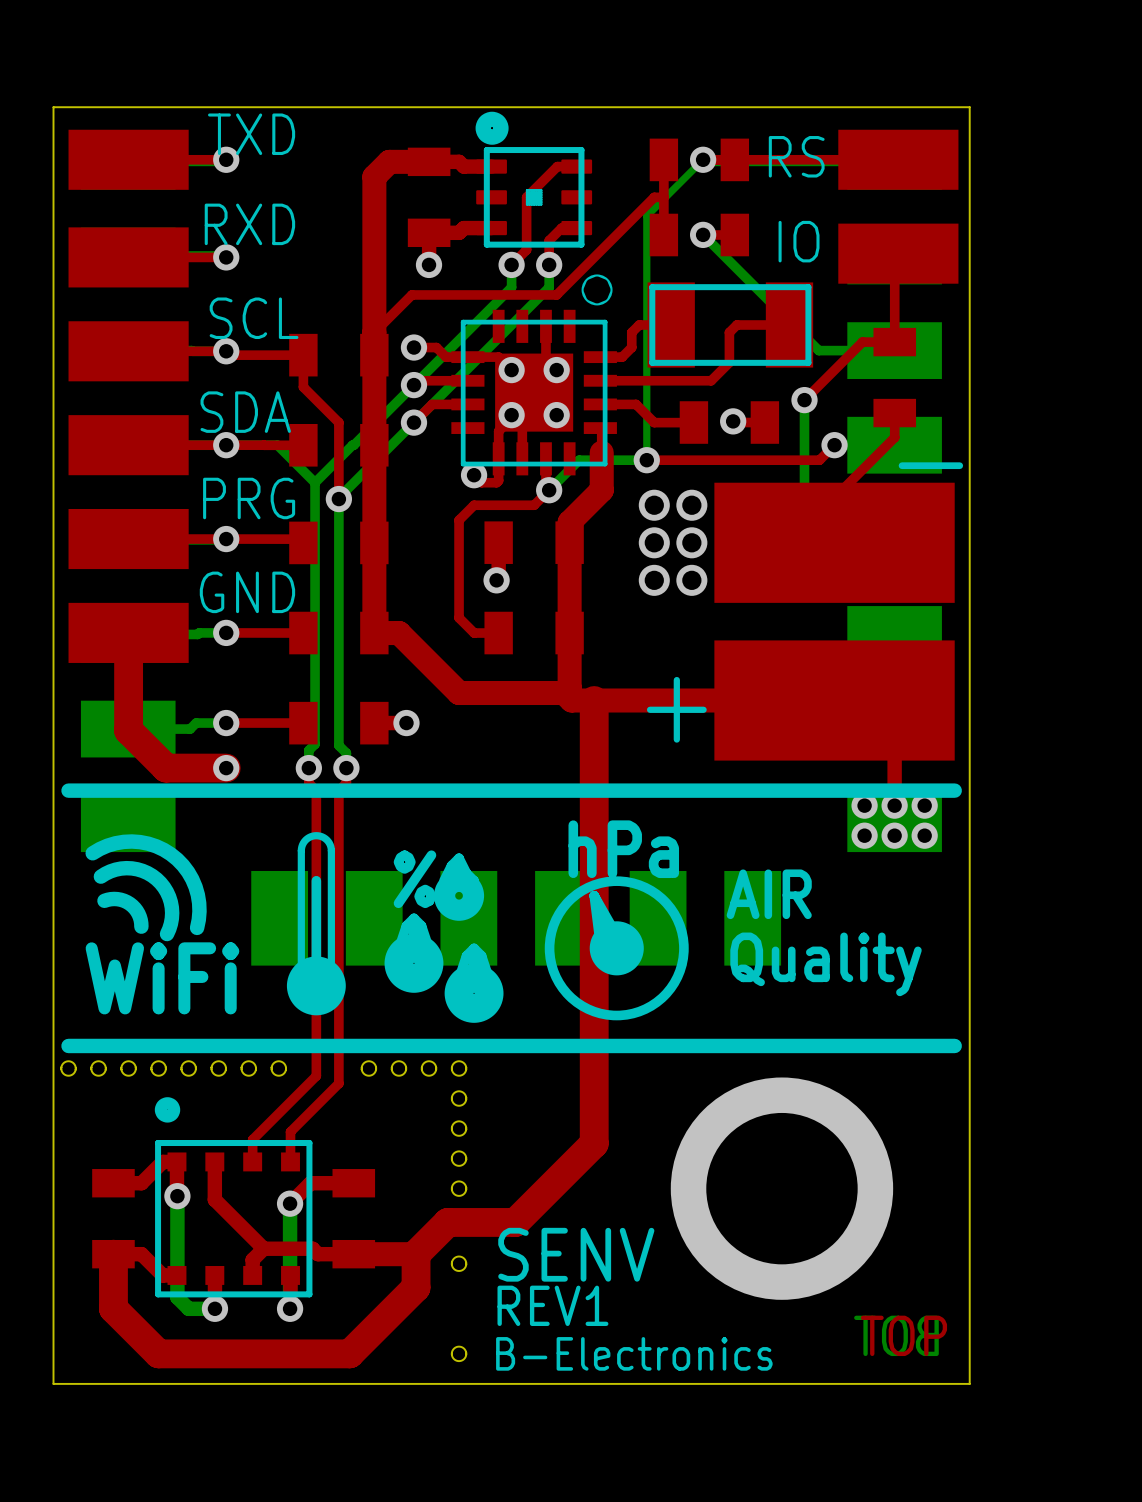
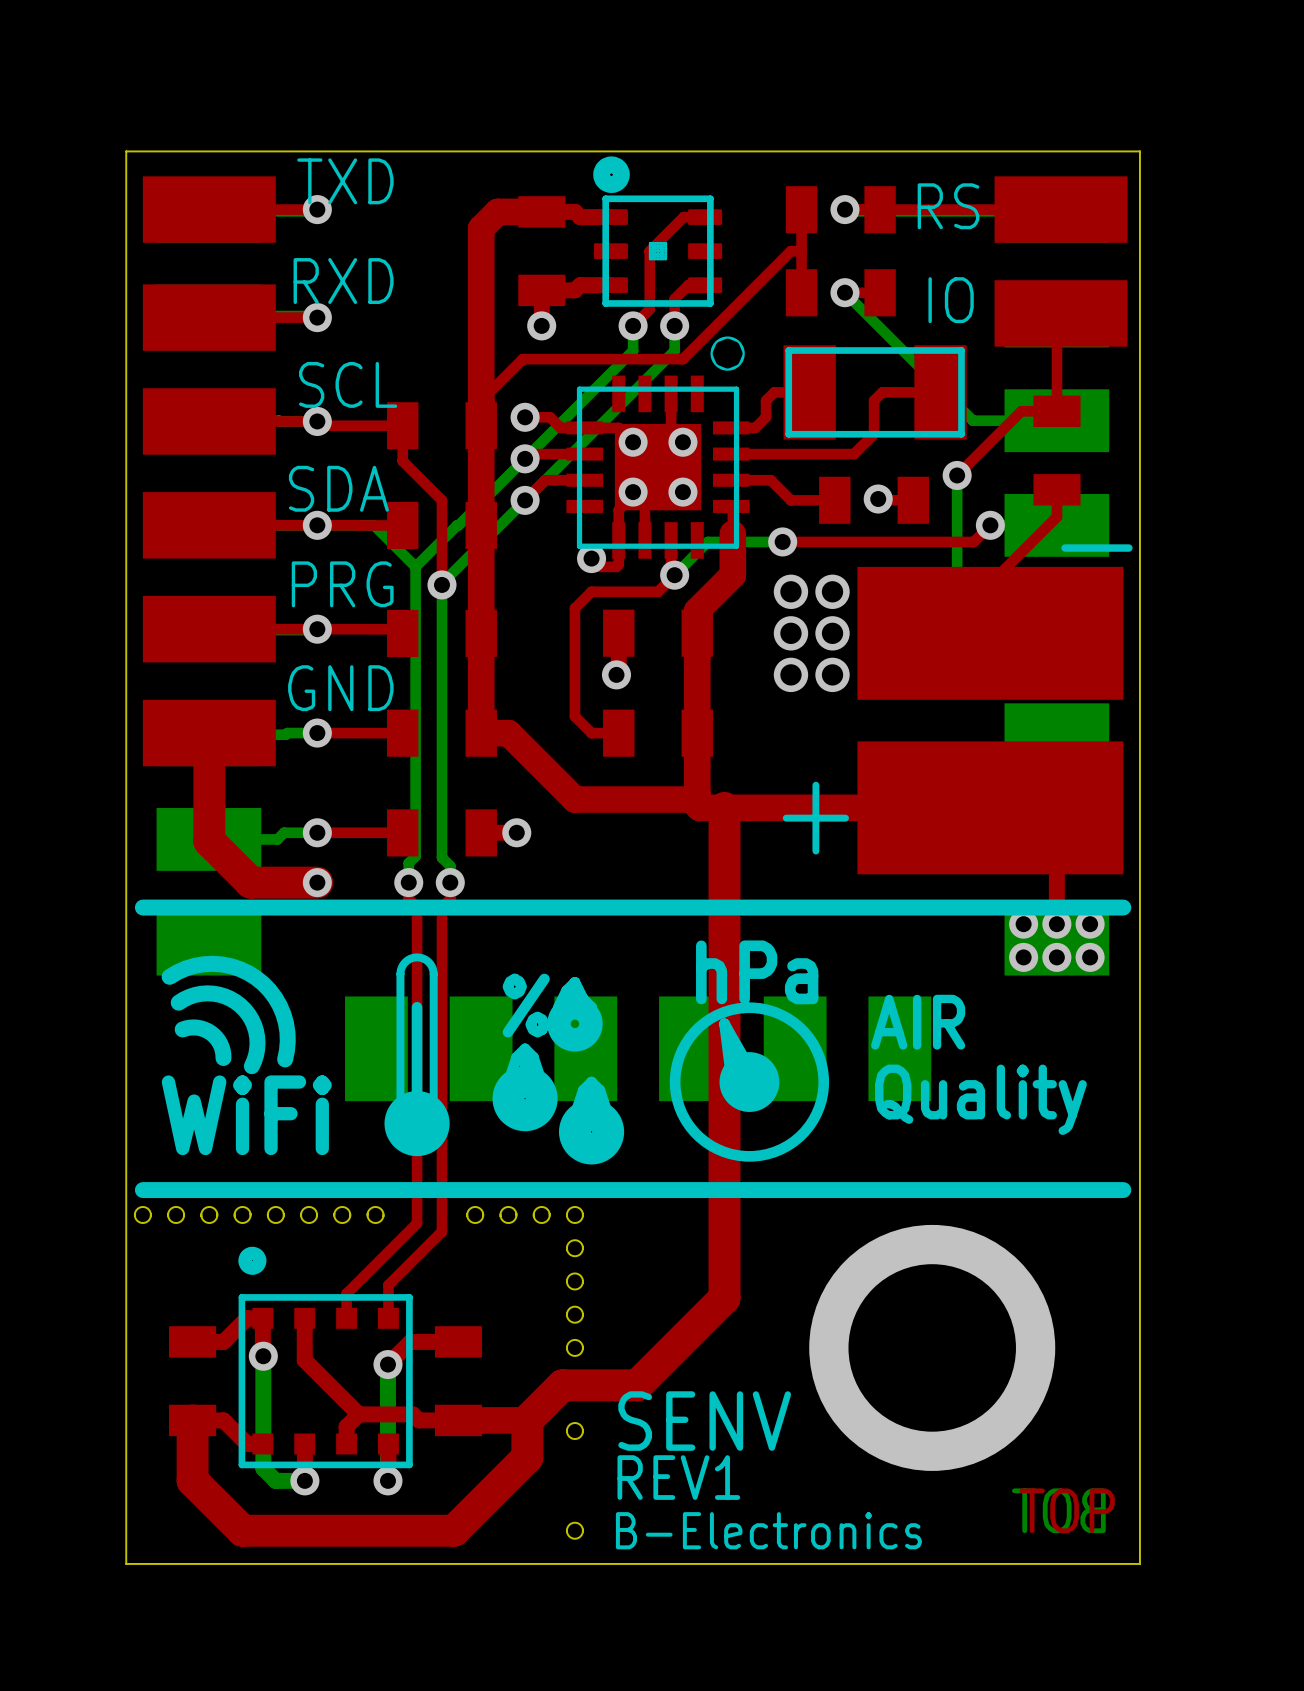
bottom track: (703, 159) (646, 216) (646, 460) -> none

